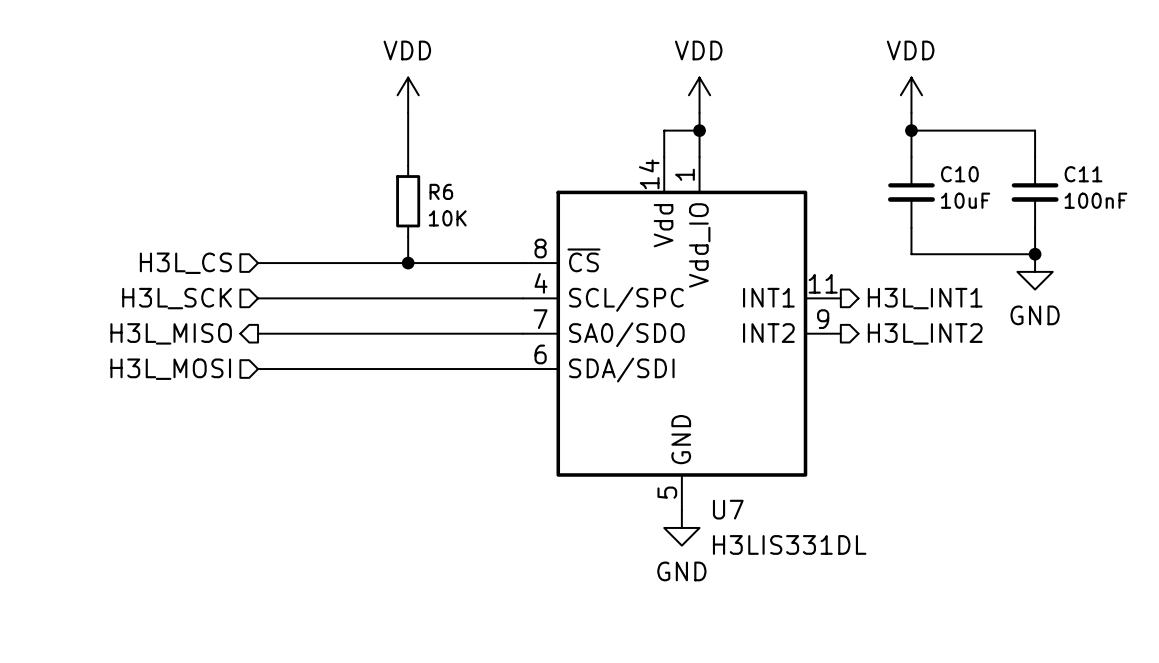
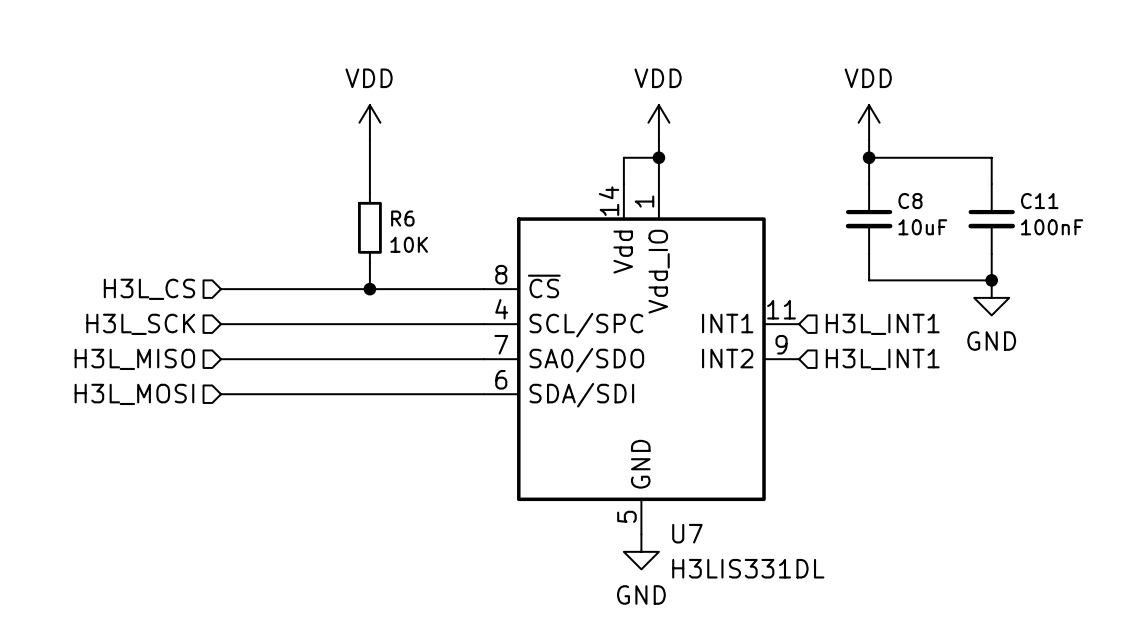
C10 name: C10 (959, 174) -> C8 (910, 201)
hierarchical label shape: output (925, 298) -> input (882, 324)
hierarchical label shape: output (171, 333) -> input (134, 359)
hierarchical label shape: output (925, 333) -> input (882, 359)
hierarchical label: H3L_INT2 (925, 333) -> H3L_INT1 (882, 359)

